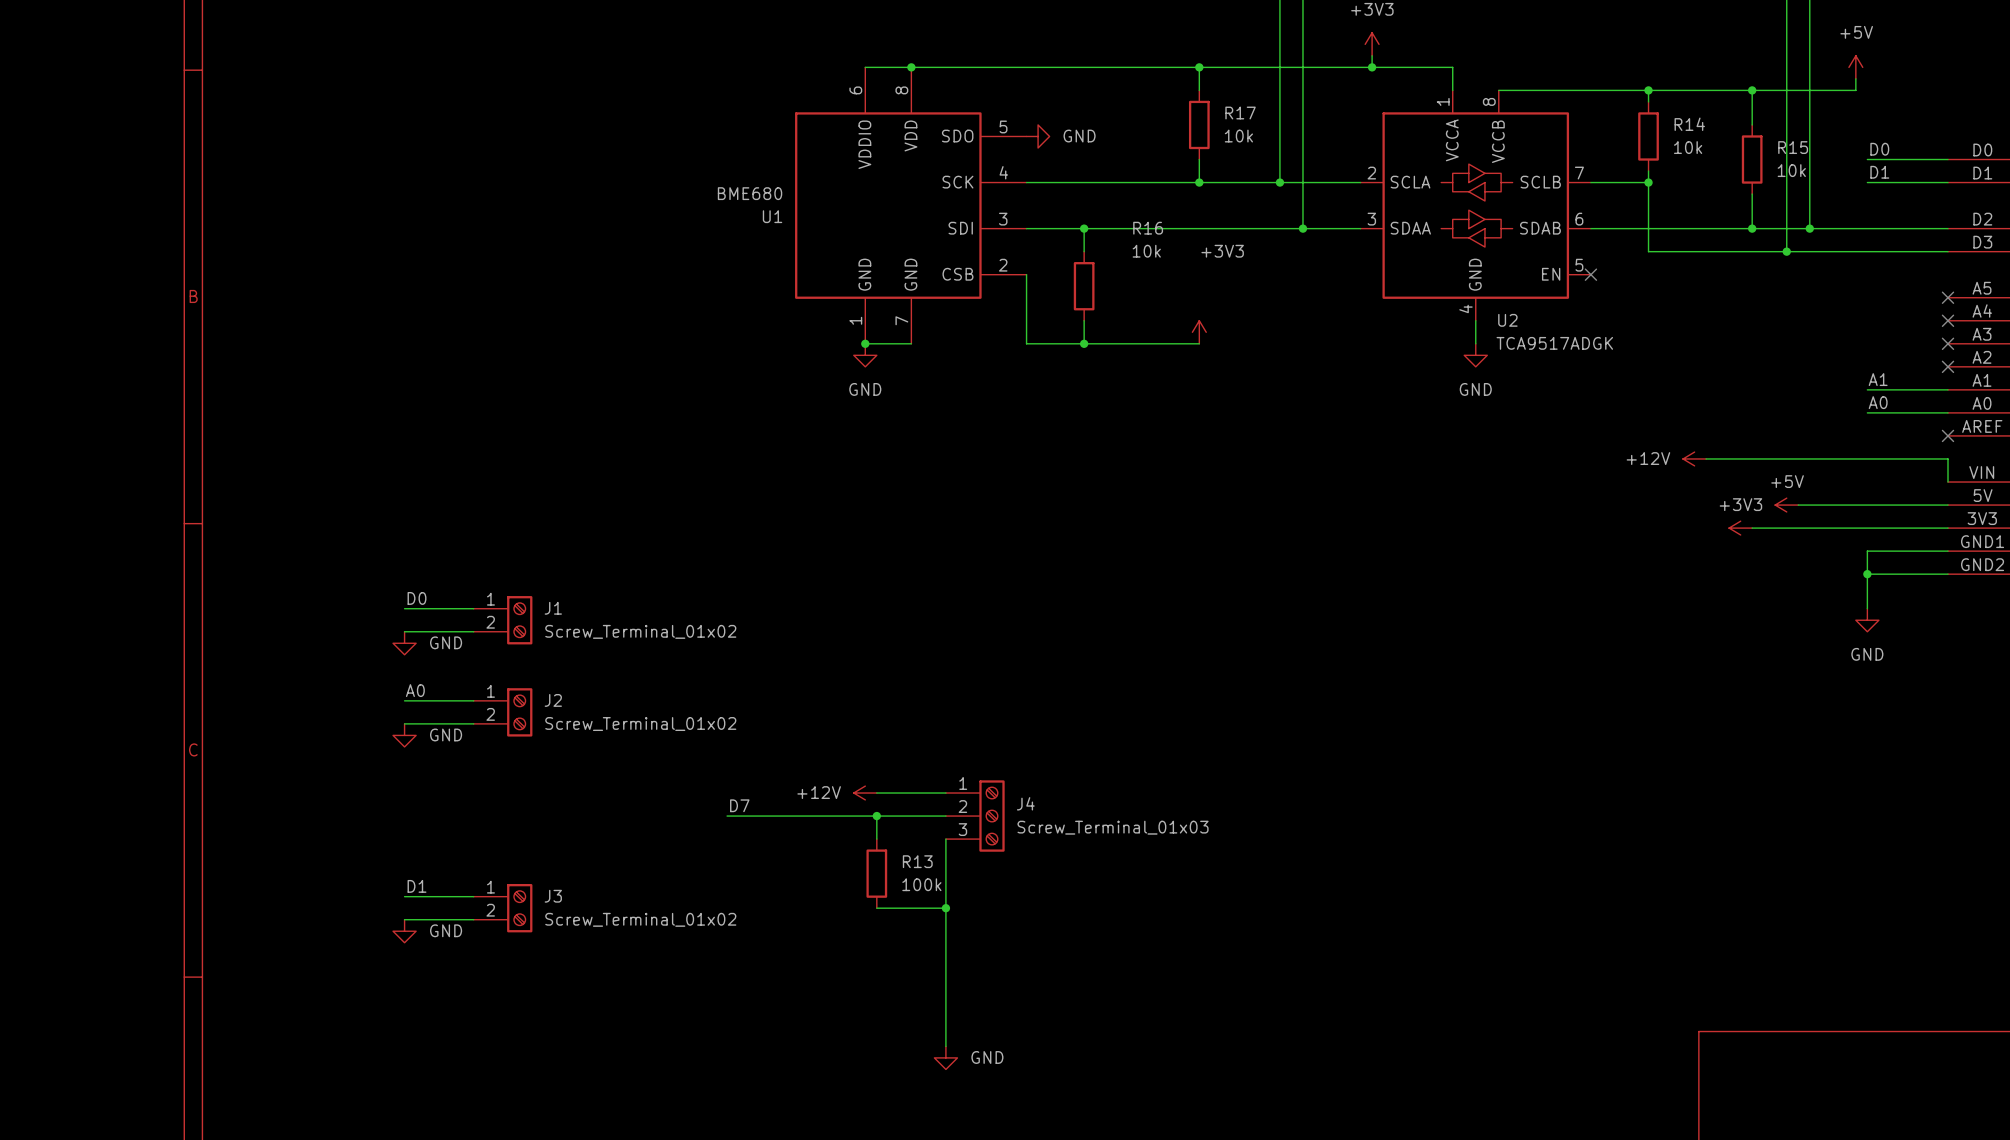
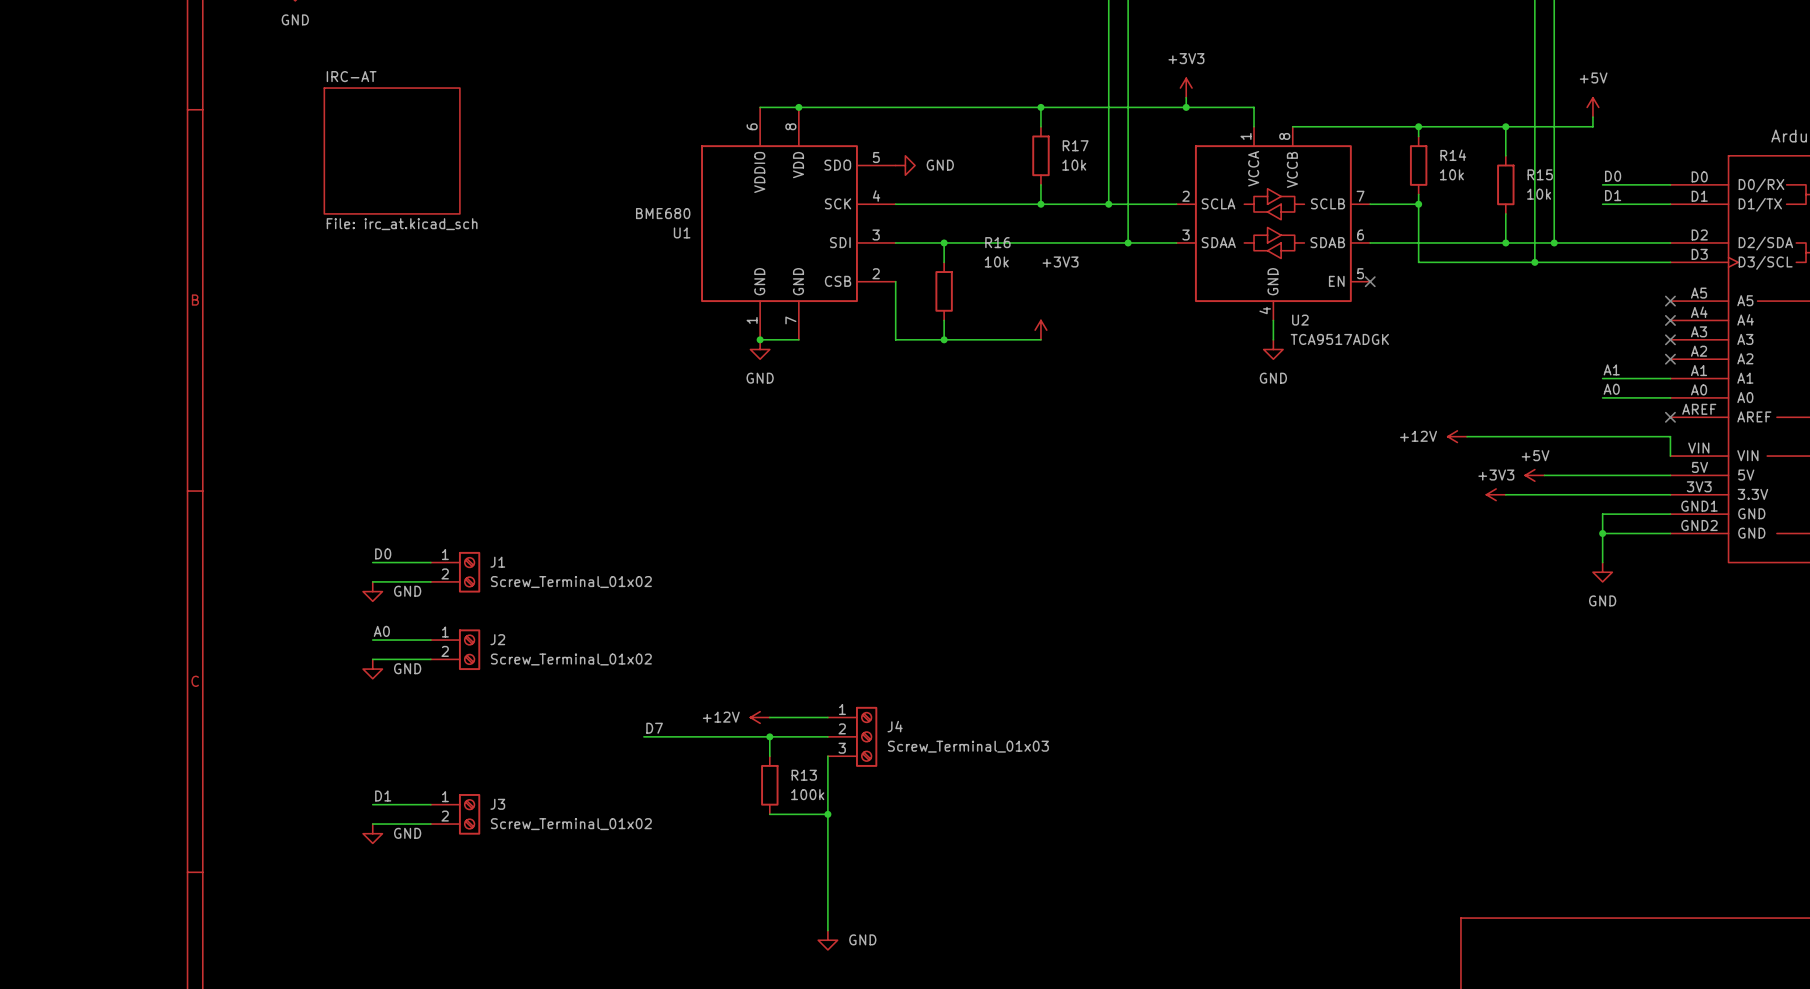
sheet IRC-AT: none -> File: irc_at.kicad_sch (392, 150)

